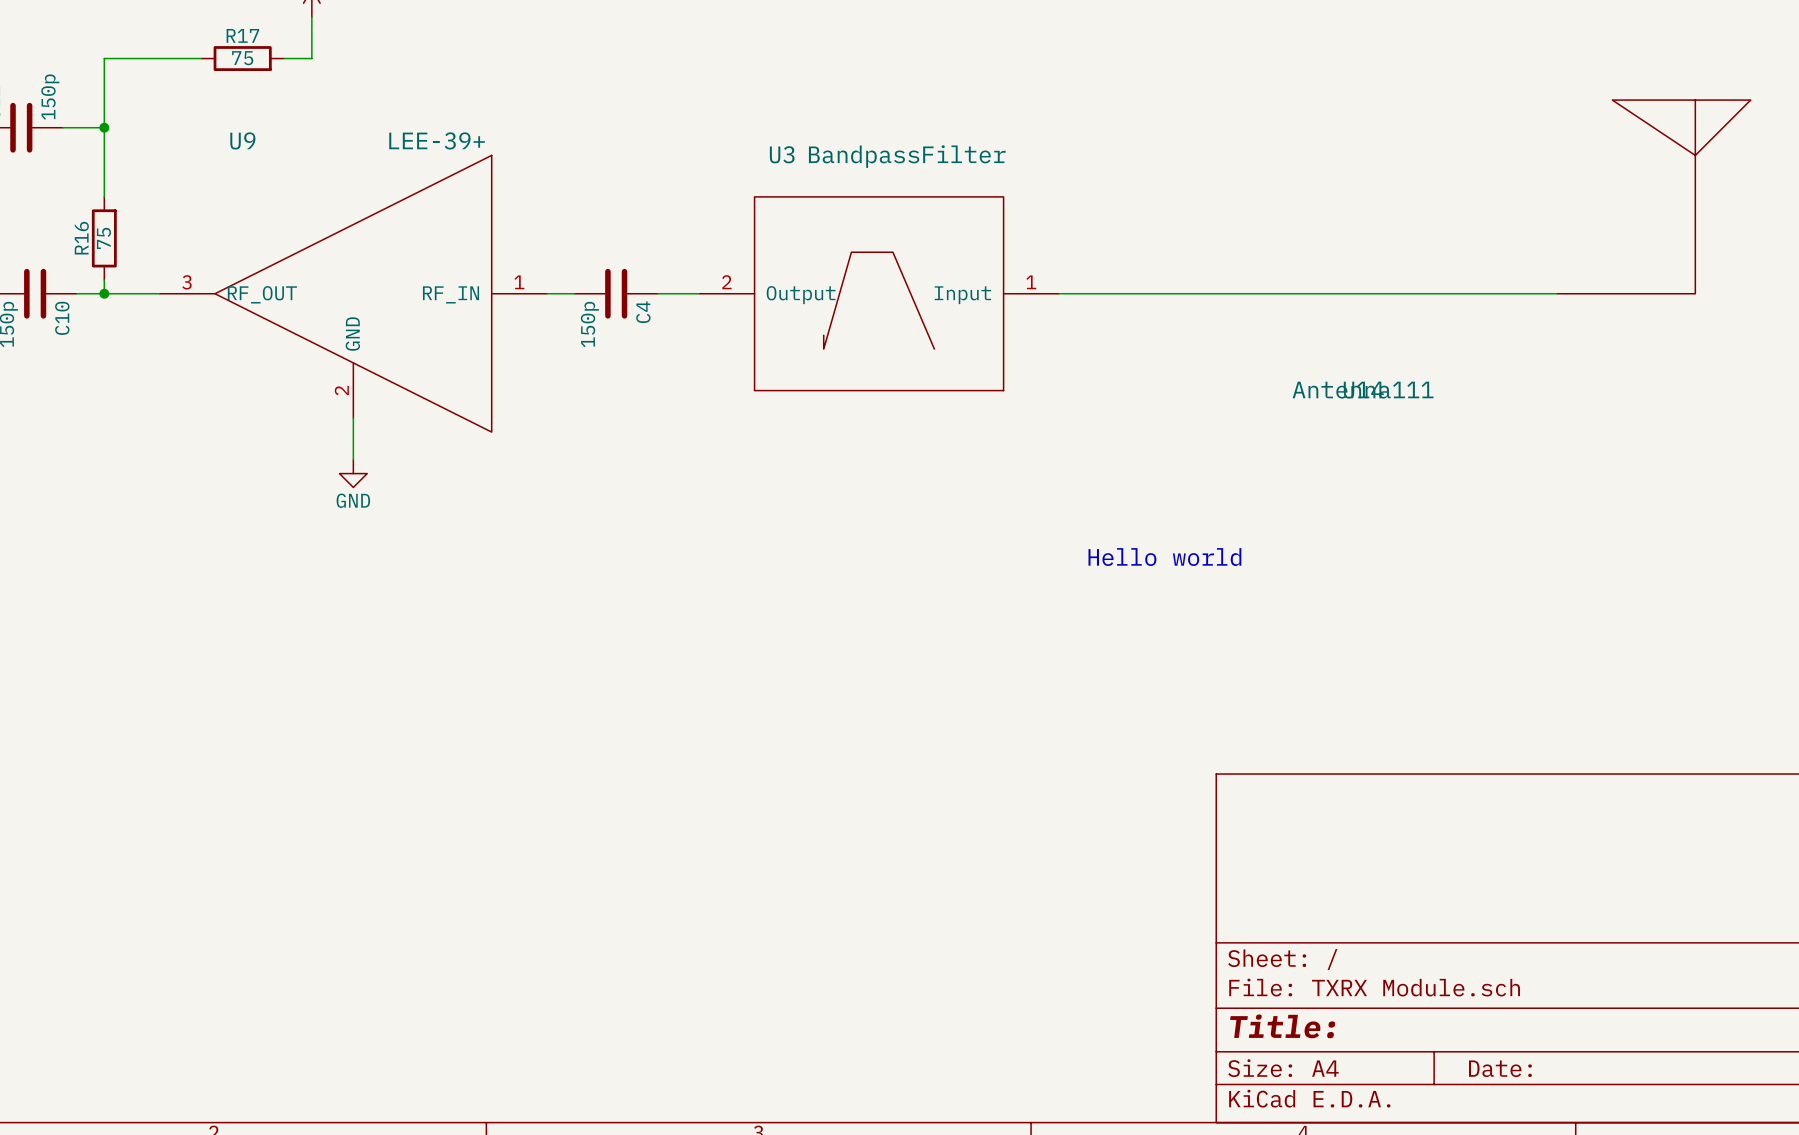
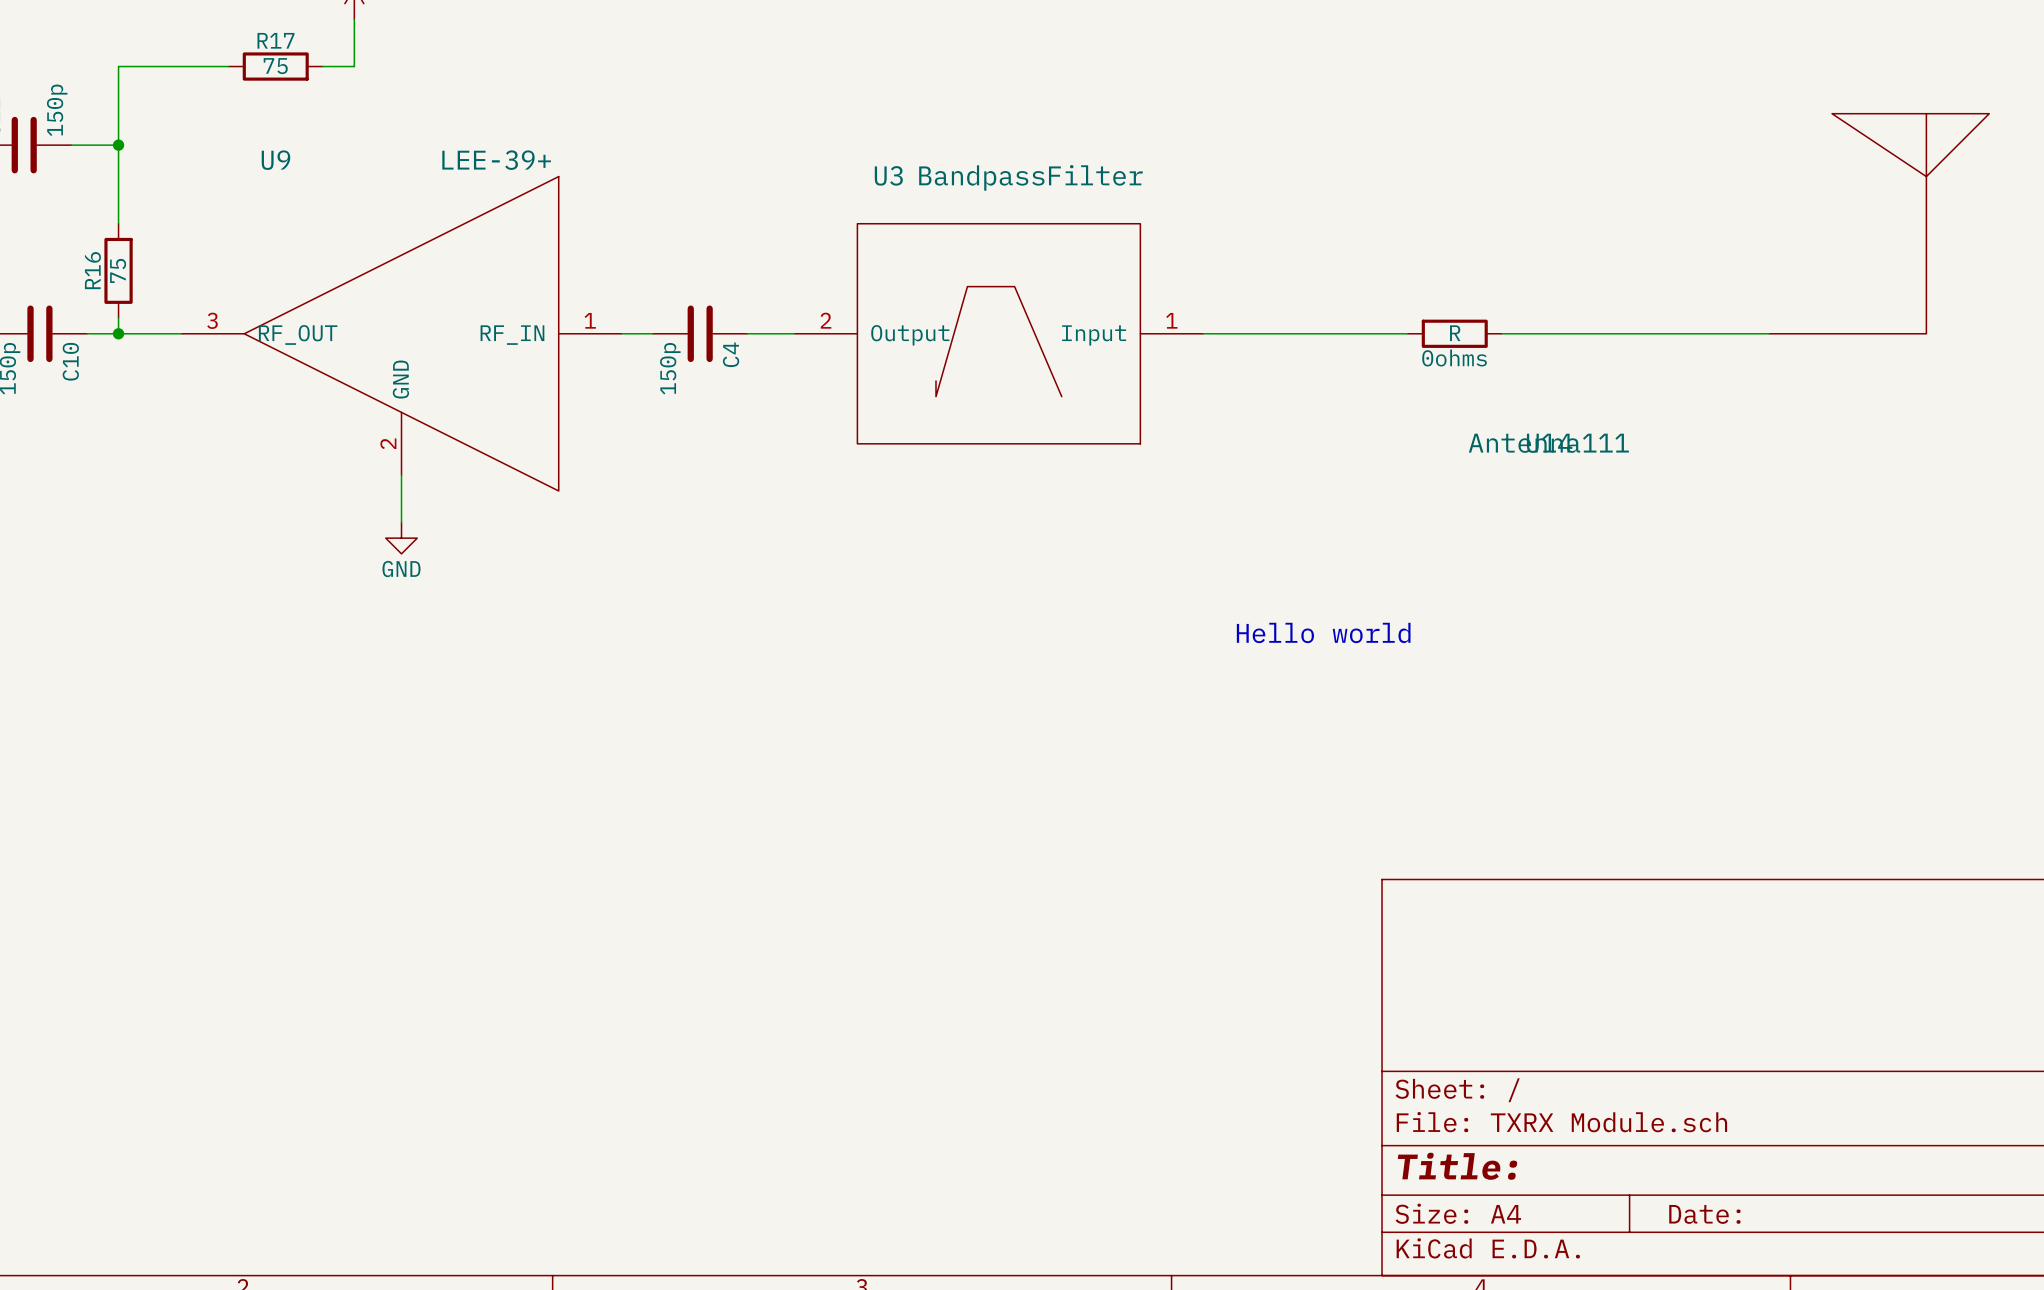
wire: (1238, 293) (1321, 293) -> none
0ohms: none -> R (1454, 333)

